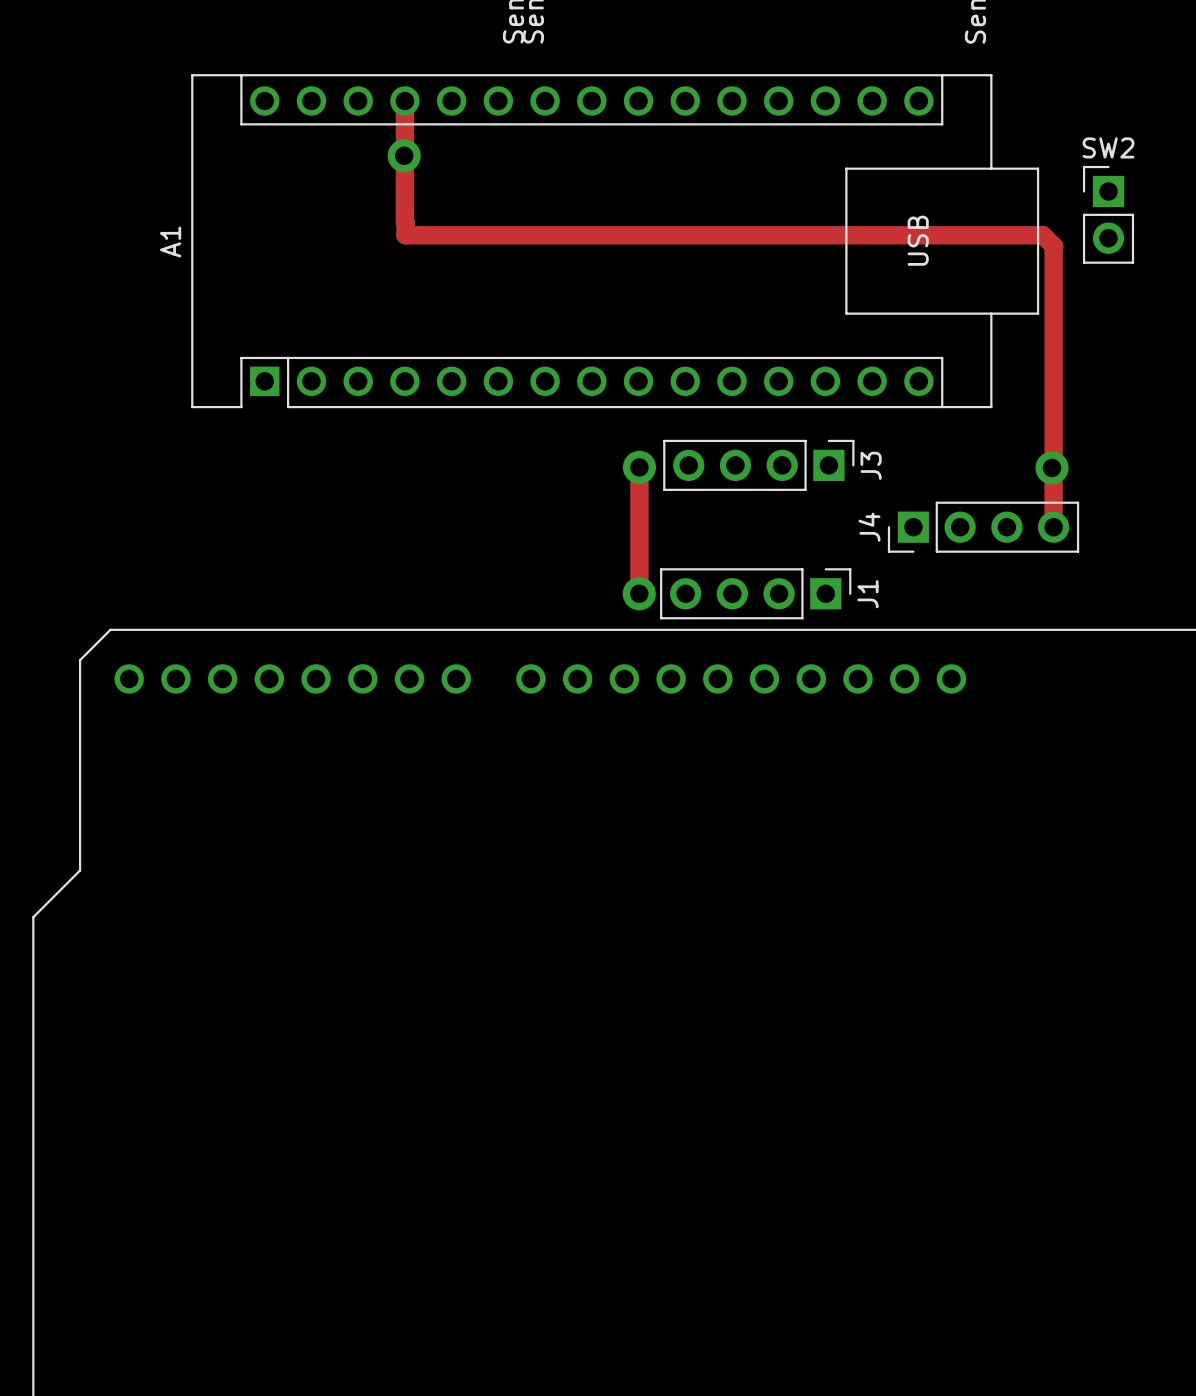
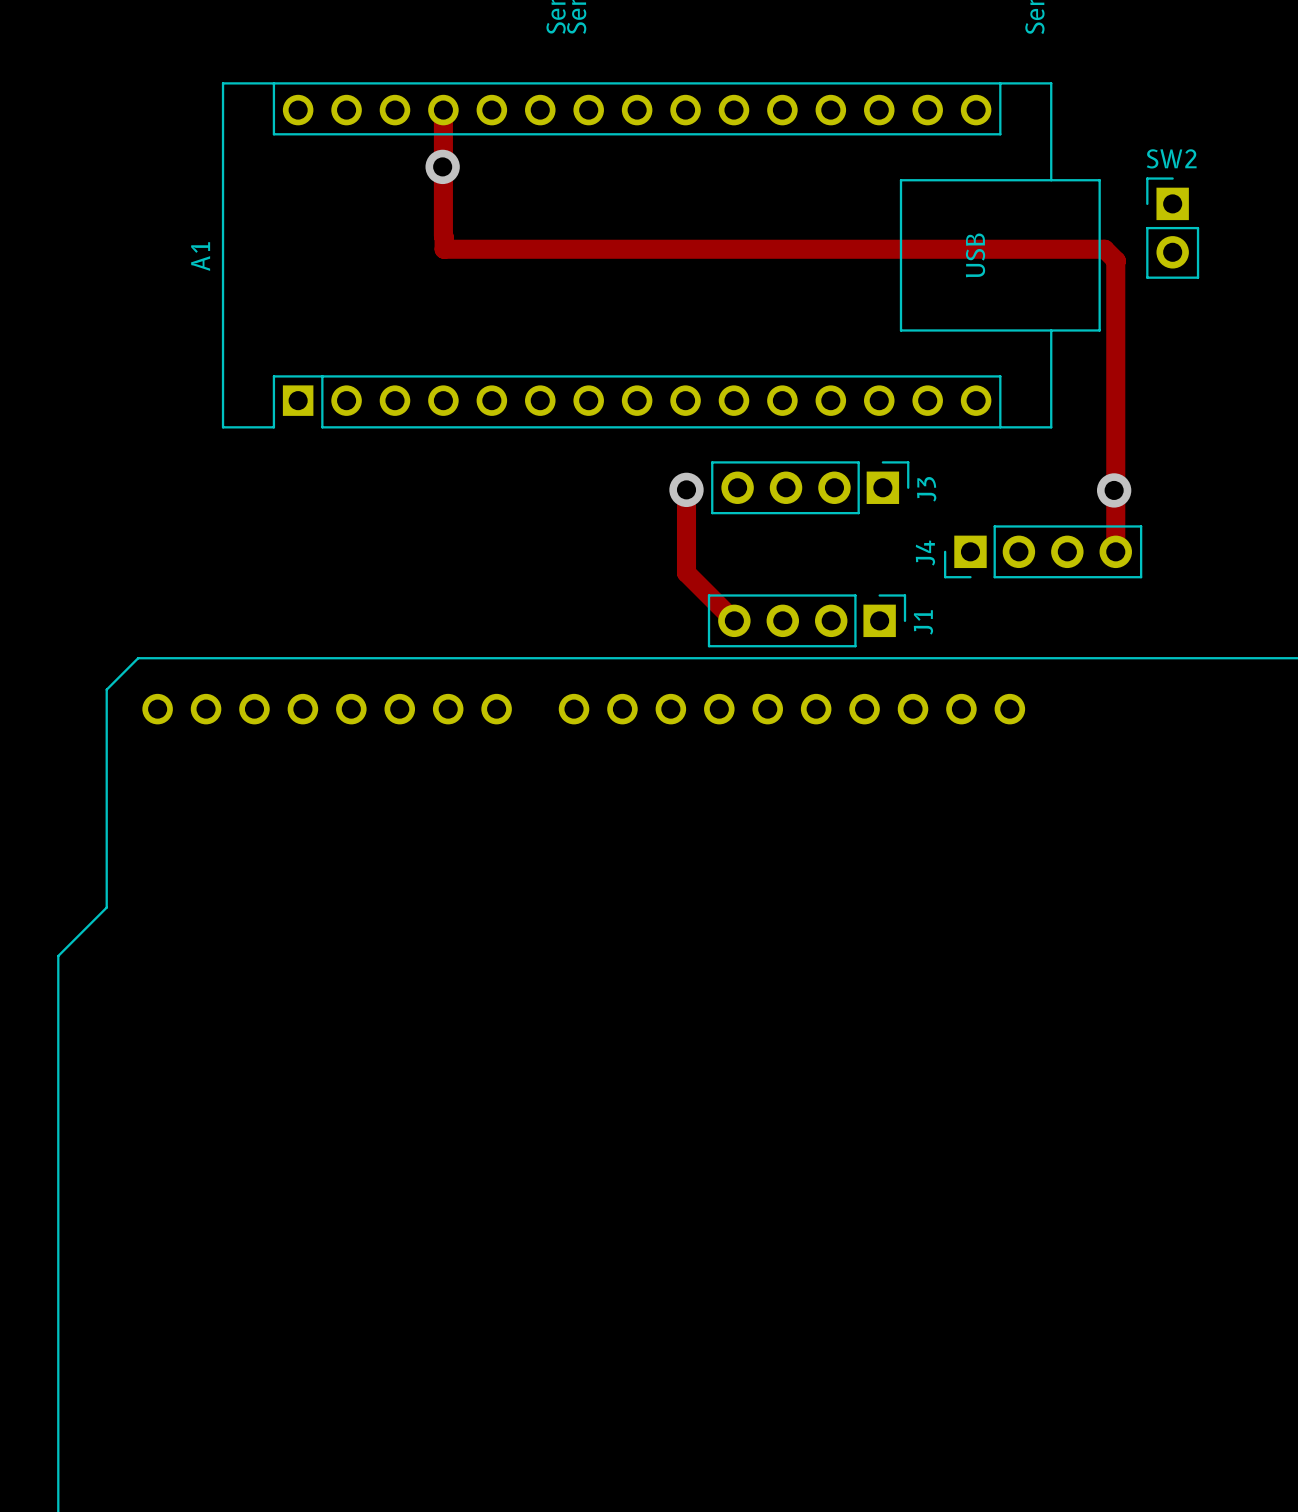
track: (639, 547) (639, 593) -> (686, 572) (734, 620)
via: (639, 593) -> none

